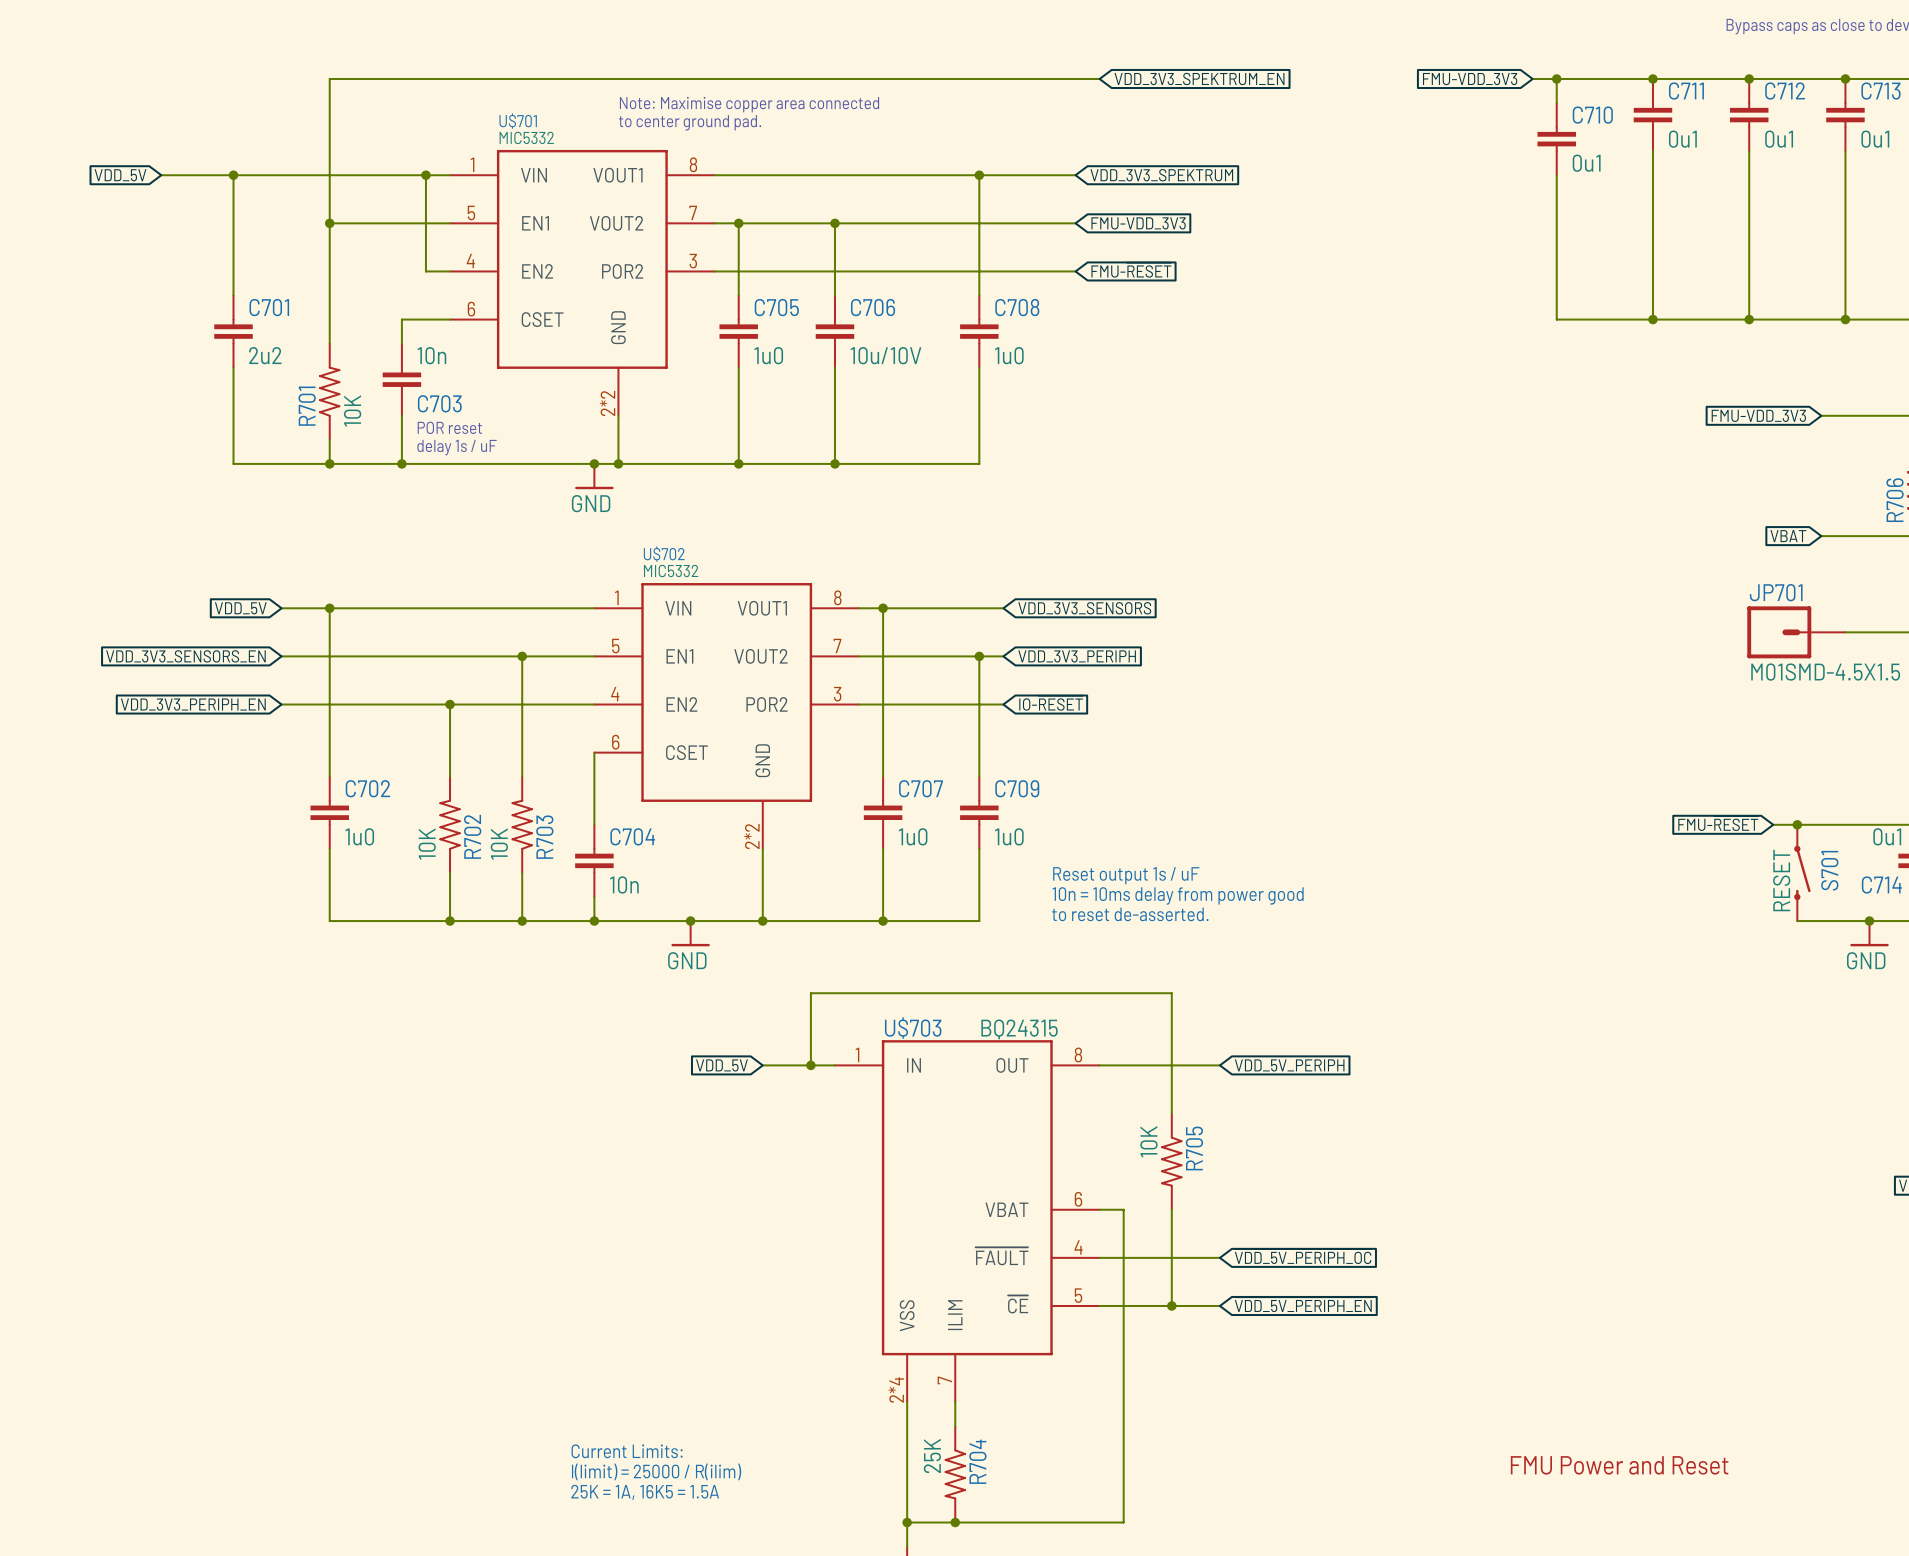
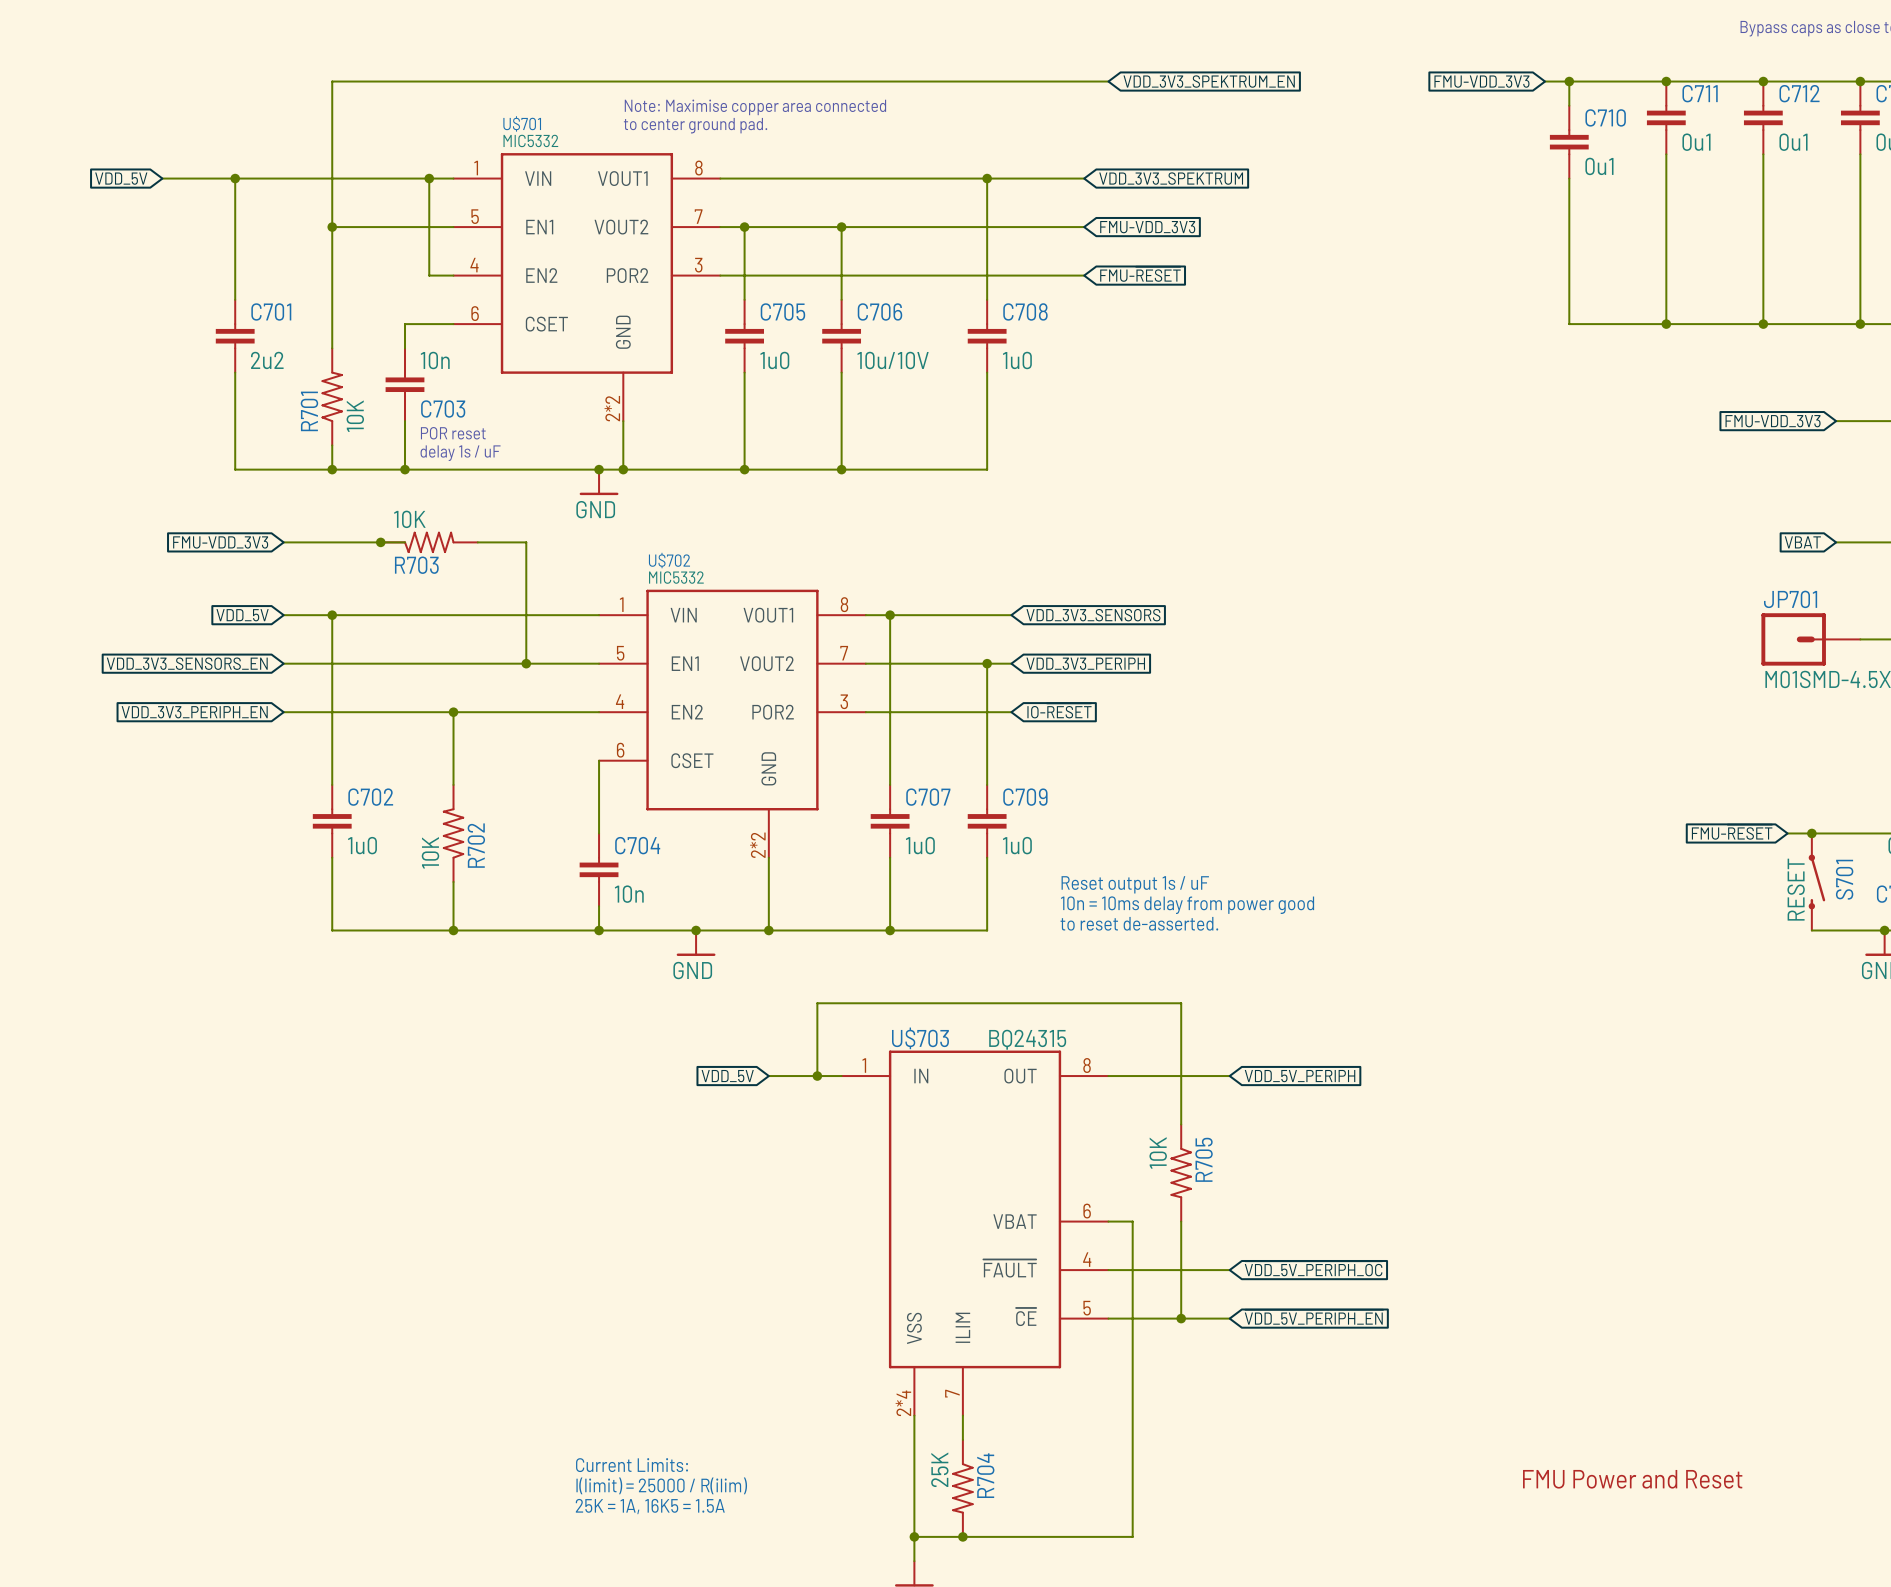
global label: none -> FMU-VDD_3V3 (220, 542)
wire: none -> (283, 542) (405, 542)
junction: none -> (380, 542)
wire: (522, 656) (522, 776) -> (526, 663) (526, 542) (477, 542)
R703 rotation: 0° (522, 824) -> 90° clockwise (429, 542)
R703 position: (522, 824) -> (429, 542)
wire: (522, 872) (522, 921) -> none
junction: (522, 921) -> none

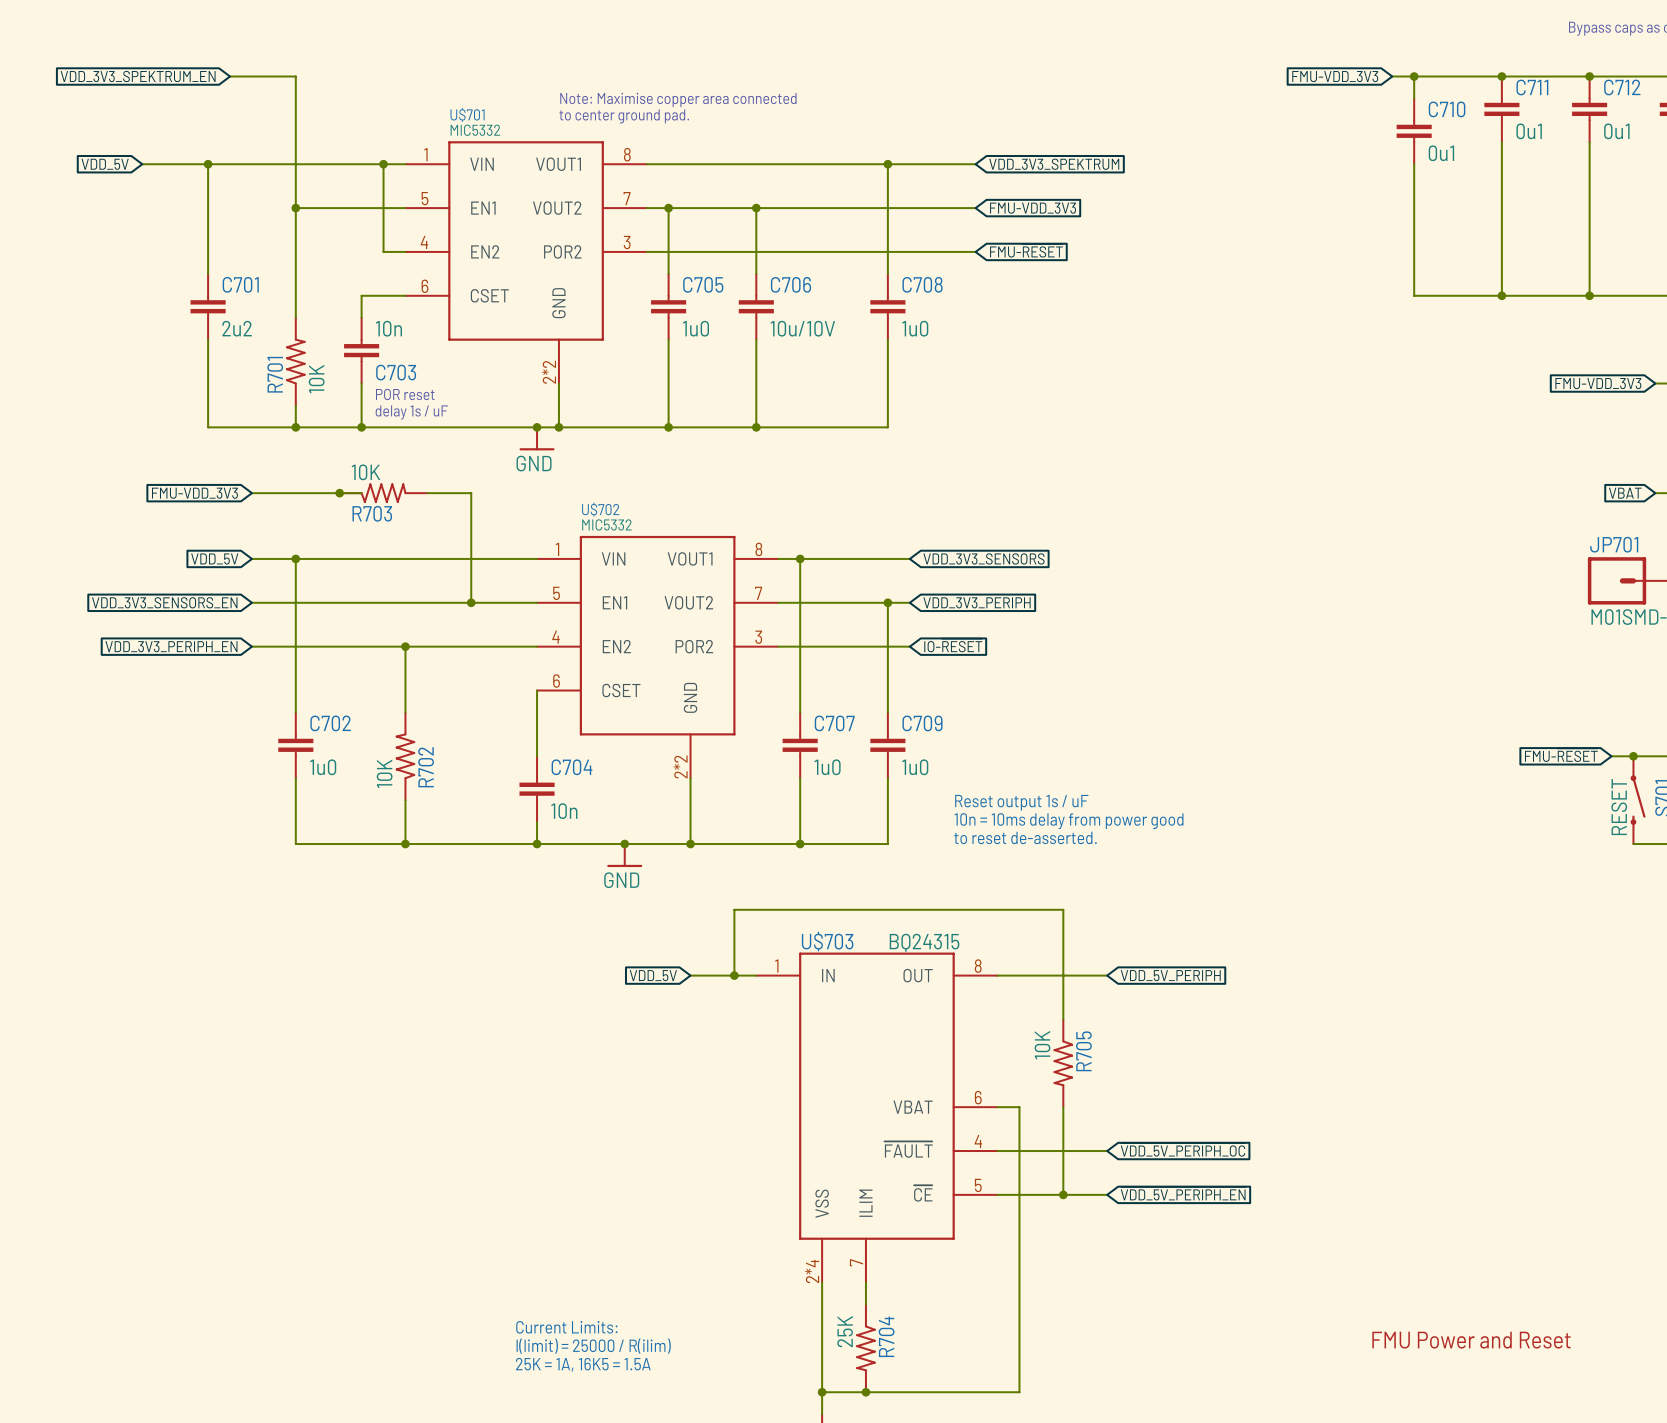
global label: none -> VDD_3V3_SPEKTRUM_EN (138, 76)
wire: (332, 81) (1108, 81) -> (295, 76) (230, 76)
global label: VDD_3V3_SPEKTRUM_EN (1209, 81) -> none

